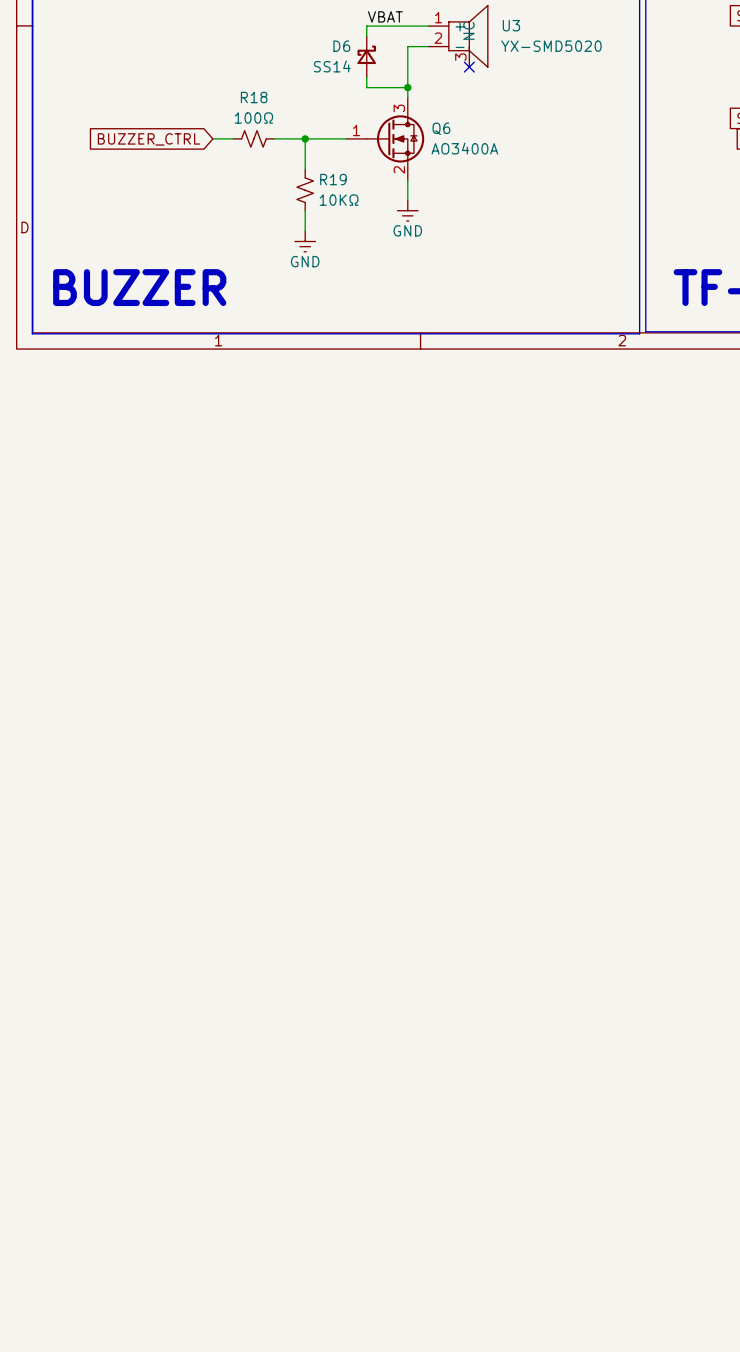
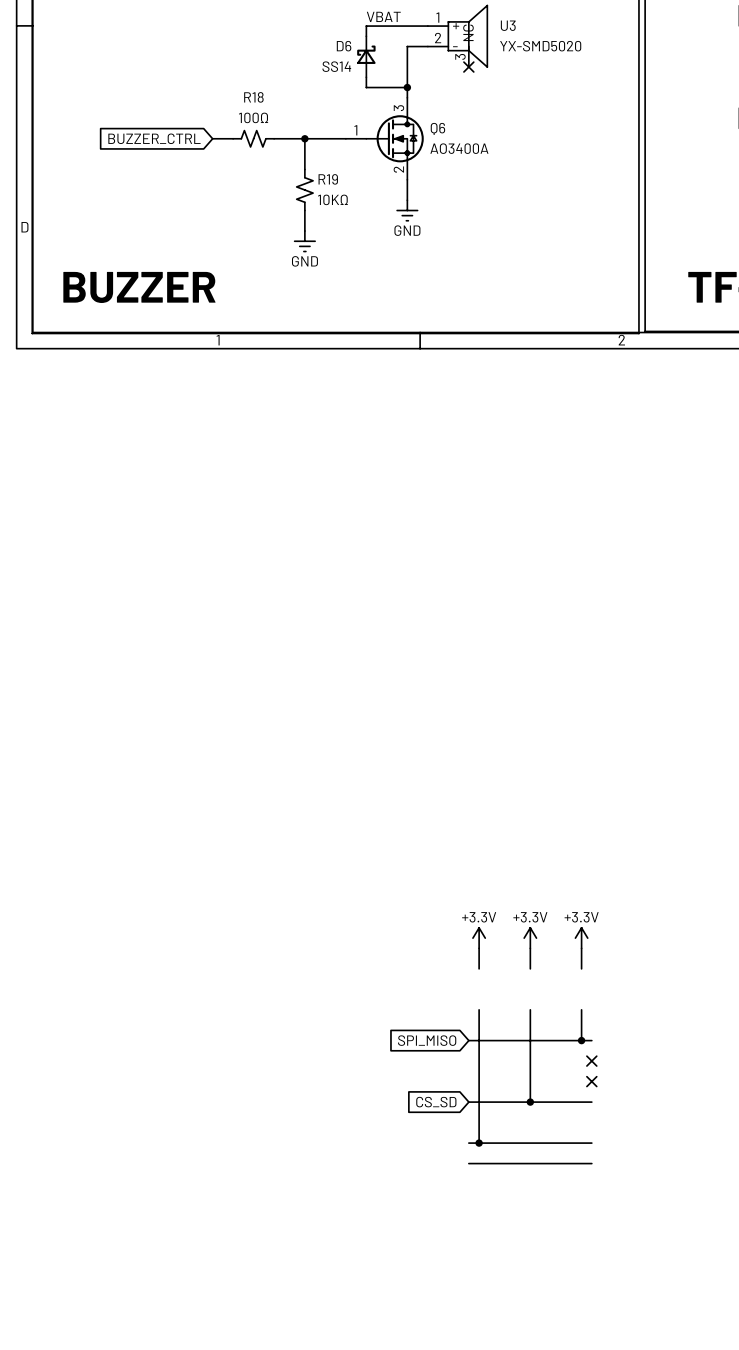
power symbol: none -> +3.3V (479, 938)
power symbol: none -> +3.3V (530, 938)
power symbol: none -> +3.3V (581, 938)
wire: none -> (479, 948) (479, 968)
wire: none -> (530, 948) (530, 968)
wire: none -> (581, 948) (581, 968)
wire: none -> (479, 1009) (479, 1143)
wire: none -> (530, 1009) (530, 1102)
wire: none -> (581, 1009) (581, 1040)
wire: none -> (468, 1040) (591, 1040)
junction: none -> (581, 1040)
global label: none -> SPI_MISO (427, 1040)
no-connect mark: none -> (591, 1061)
no-connect mark: none -> (591, 1081)
global label: none -> CS_SD (436, 1102)
wire: none -> (468, 1102) (591, 1102)
junction: none -> (530, 1102)
wire: none -> (468, 1143) (591, 1143)
junction: none -> (479, 1143)
wire: none -> (468, 1163) (591, 1163)

